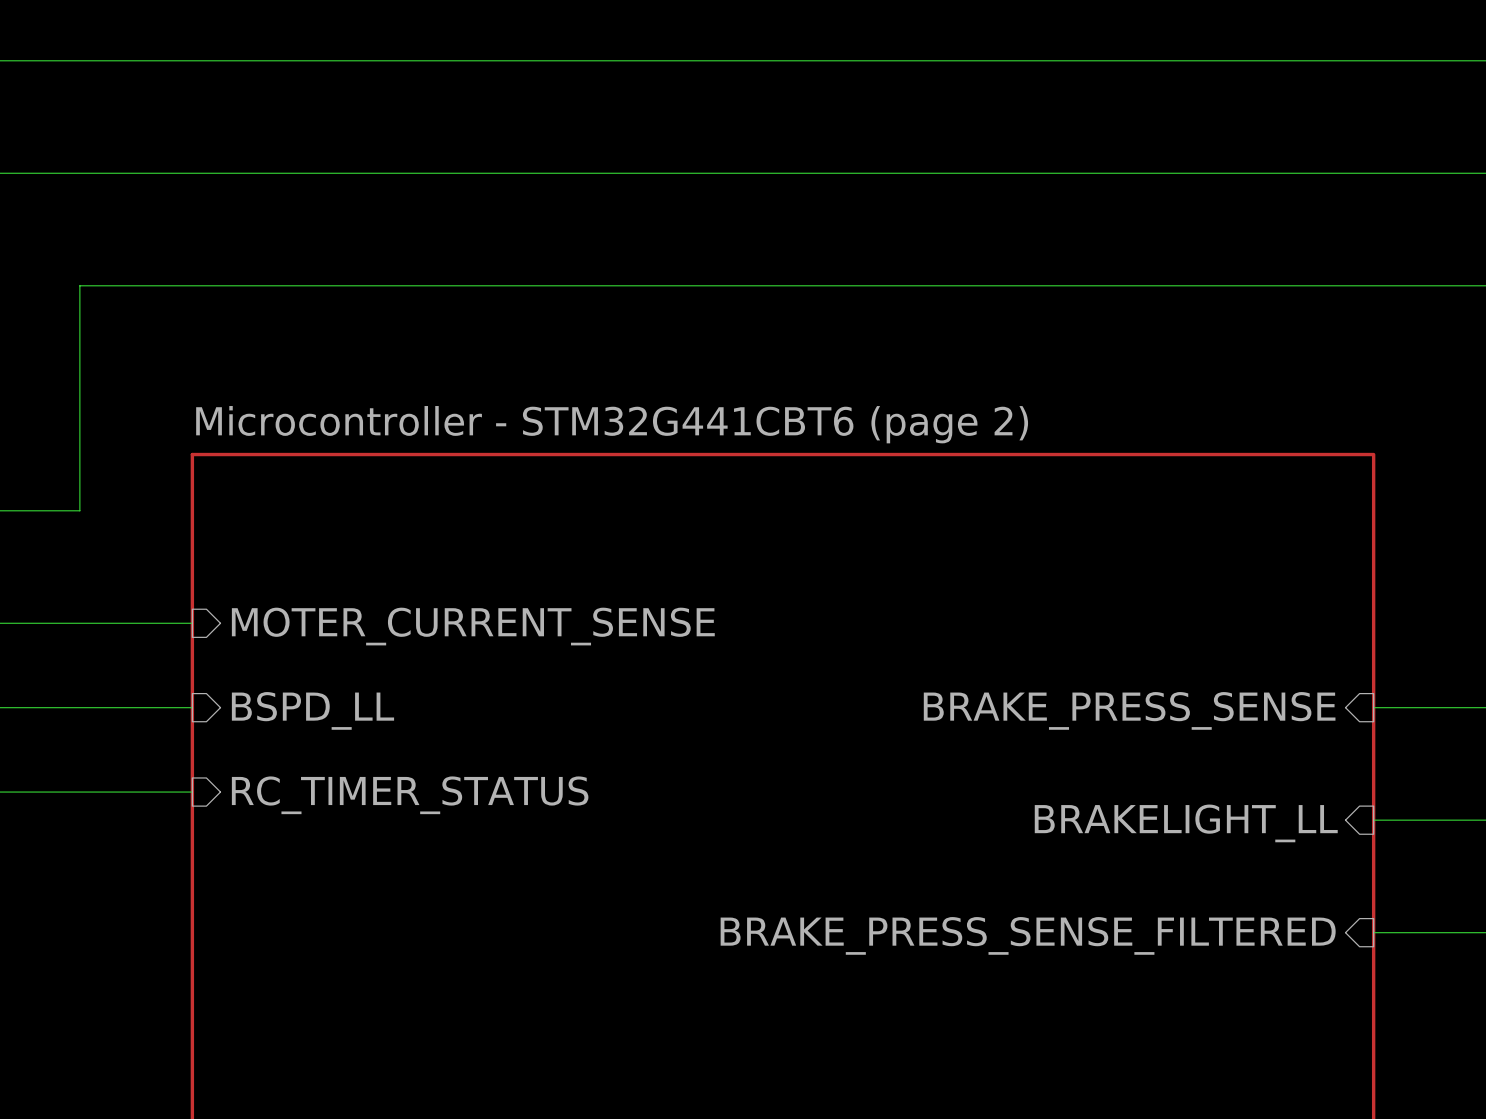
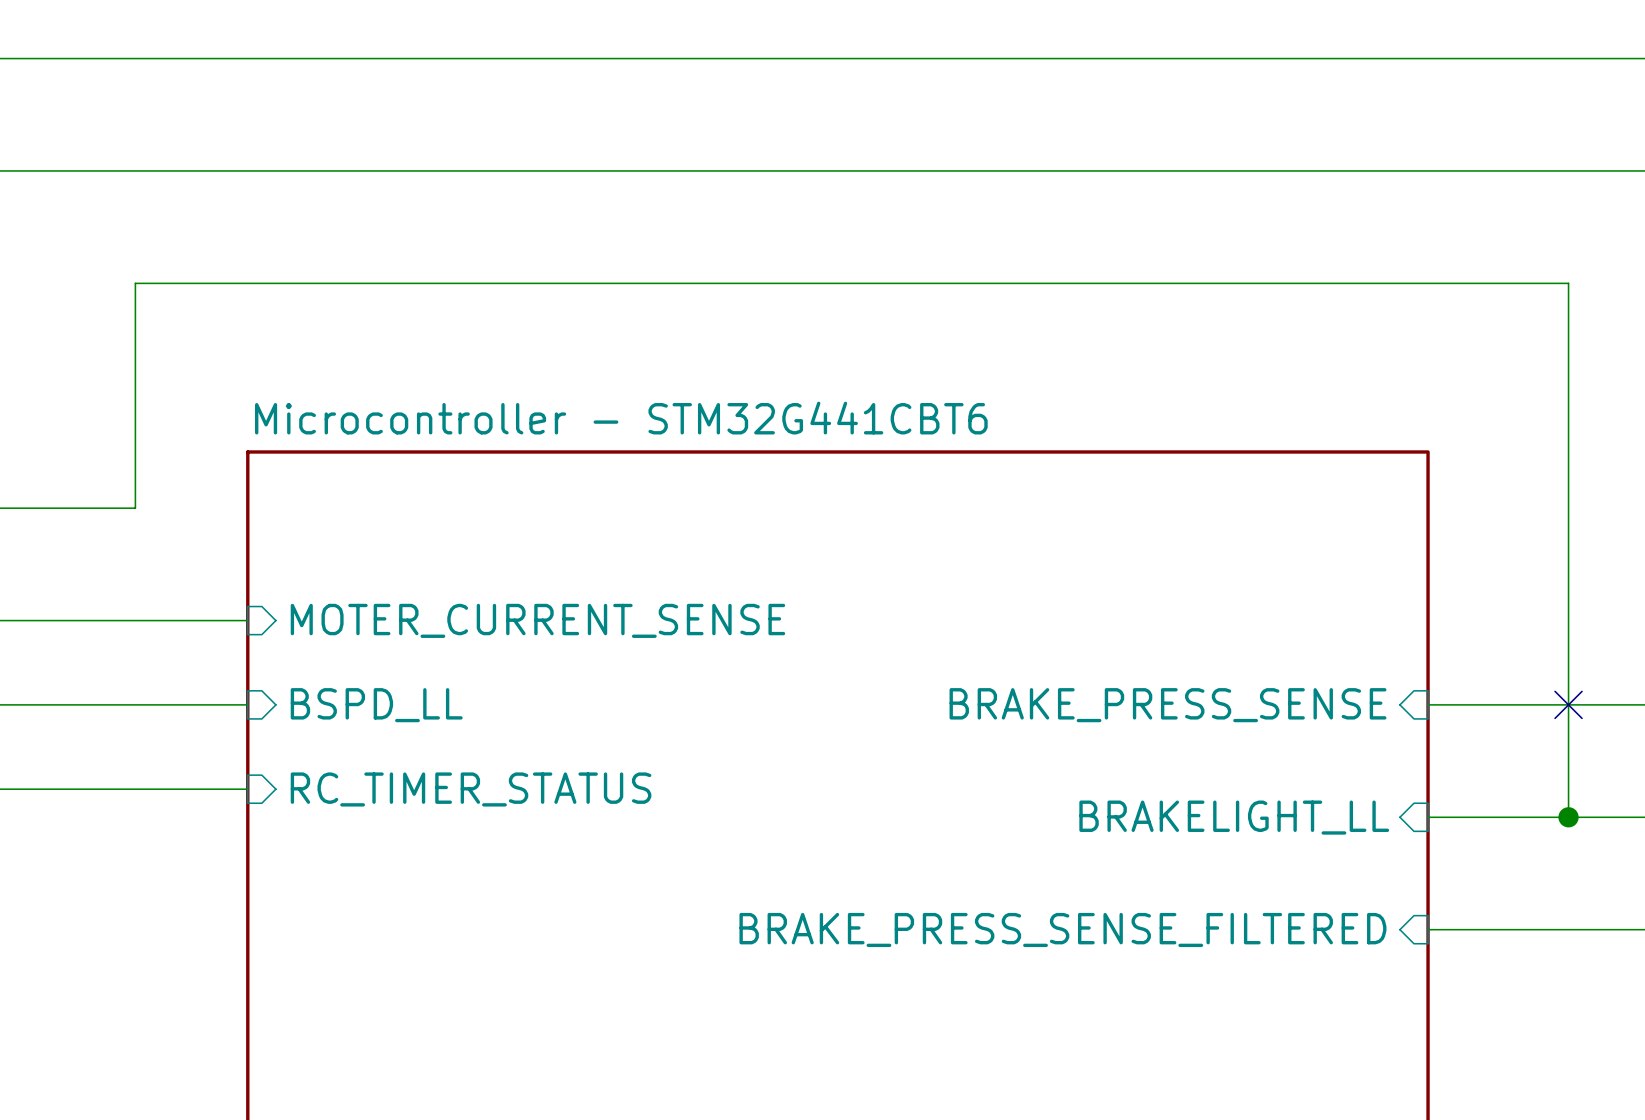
sheet Microcontroller - STM32G441CBT6 (page 2) name: Microcontroller - STM32G441CBT6 (page 2) (612, 424) -> Microcontroller - STM32G441CBT6 (621, 418)

